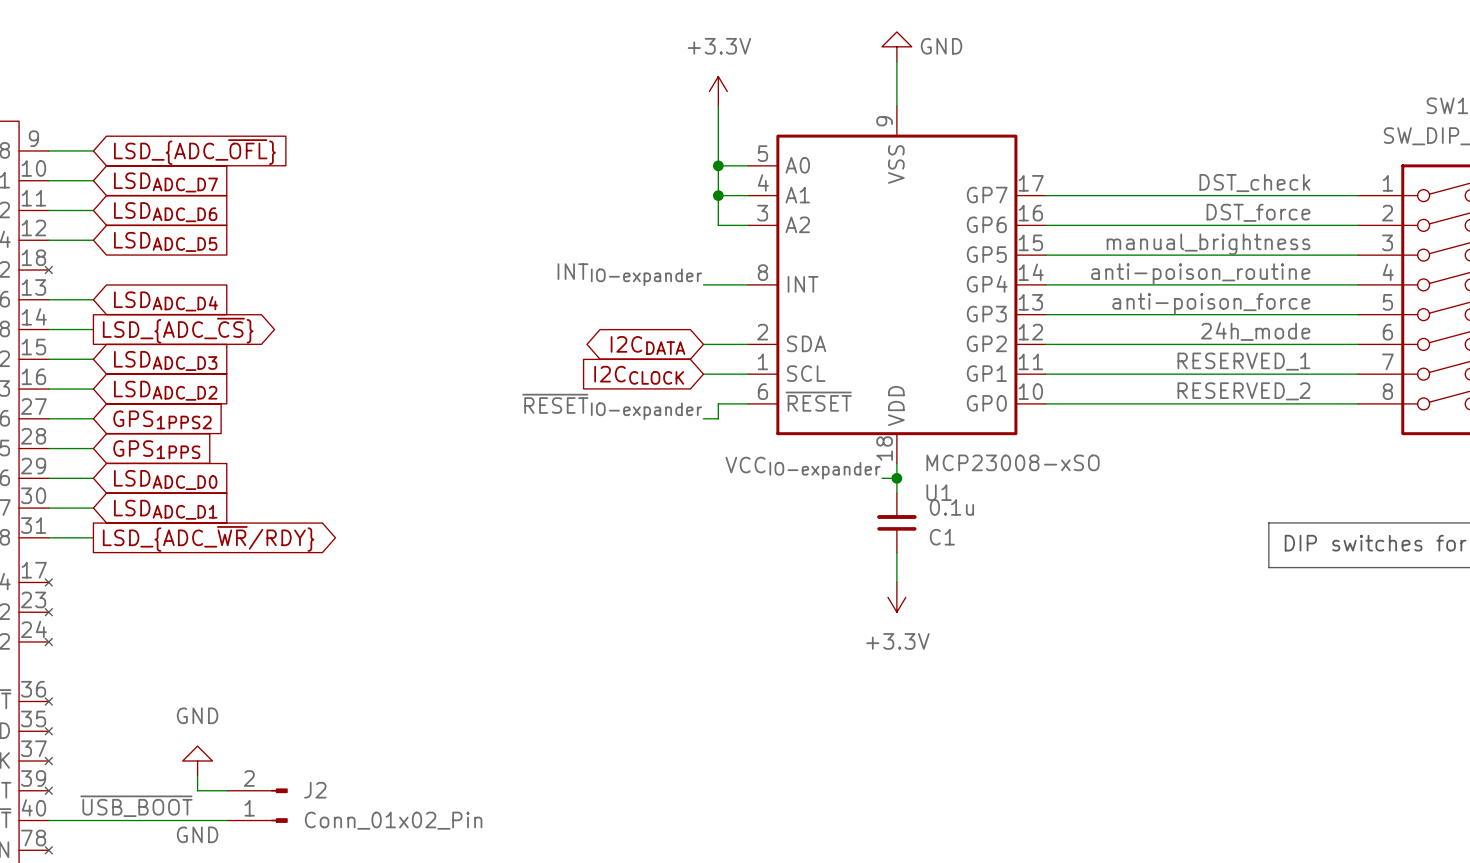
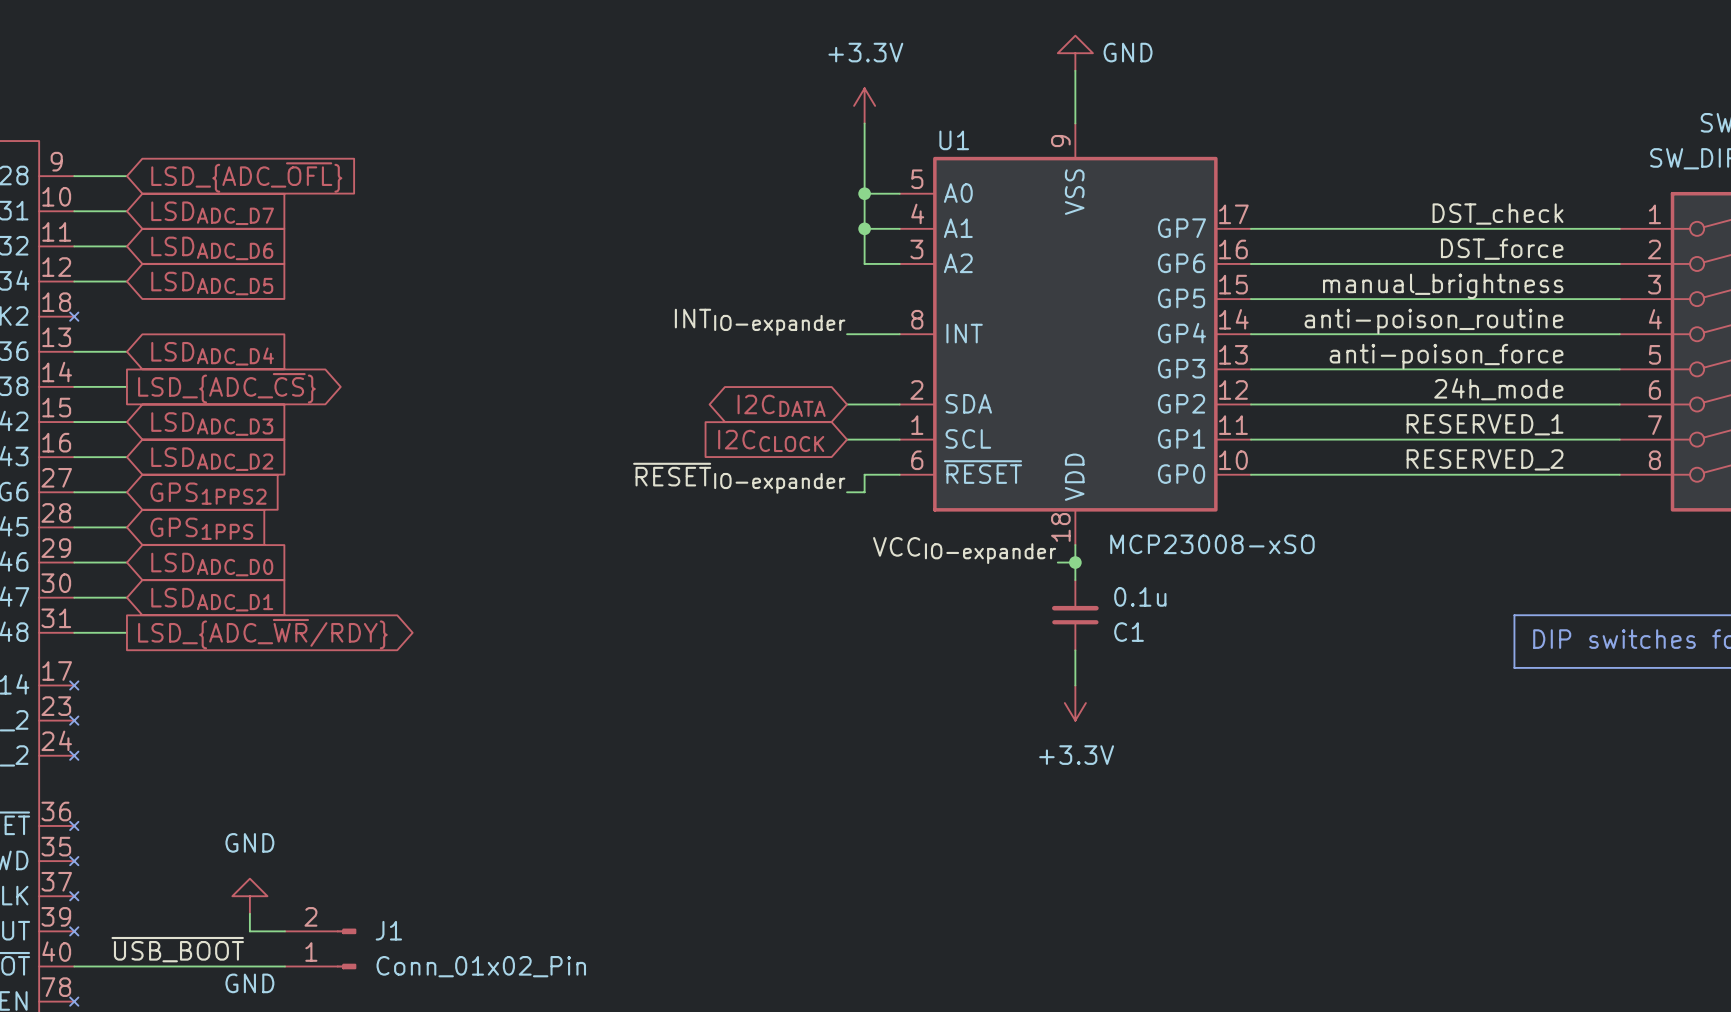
U1 name position: U1 (939, 492) -> U1 (954, 140)
J2 name: J2 (315, 790) -> J1 (388, 930)

